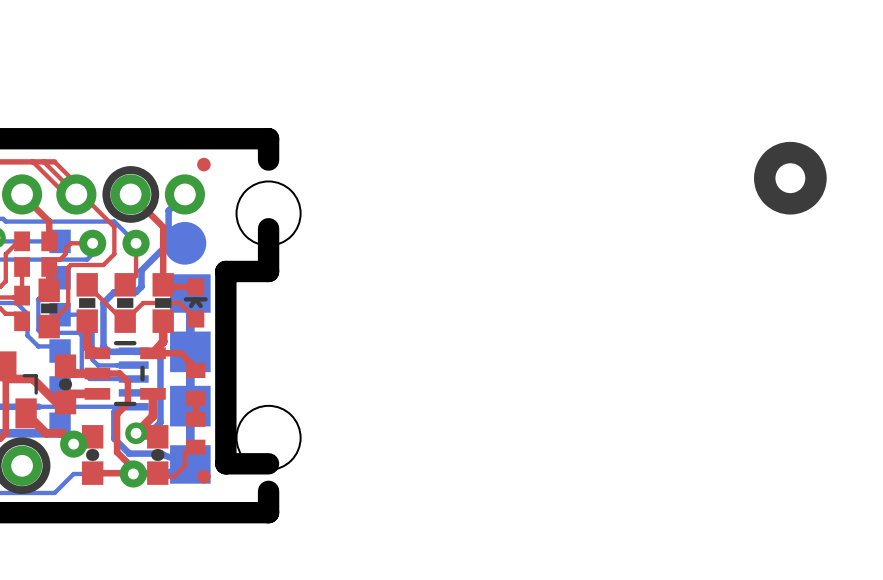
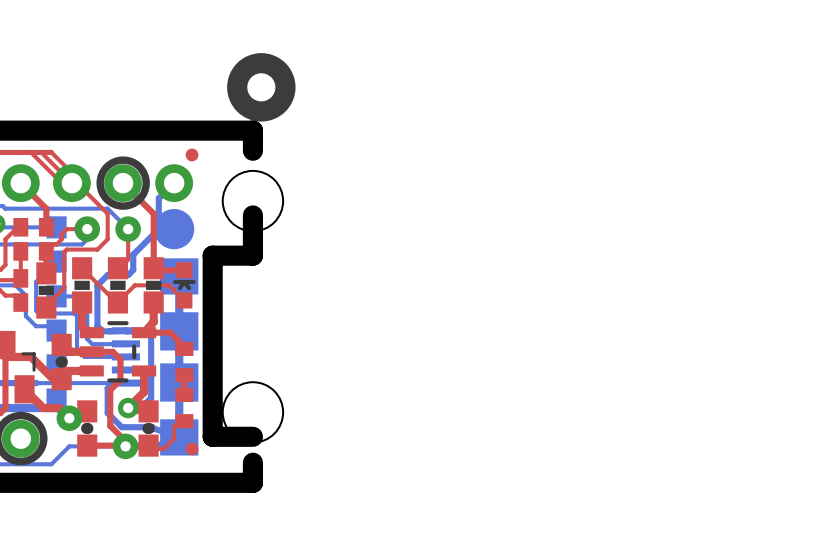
drawing position: (790, 178) -> (261, 87)

